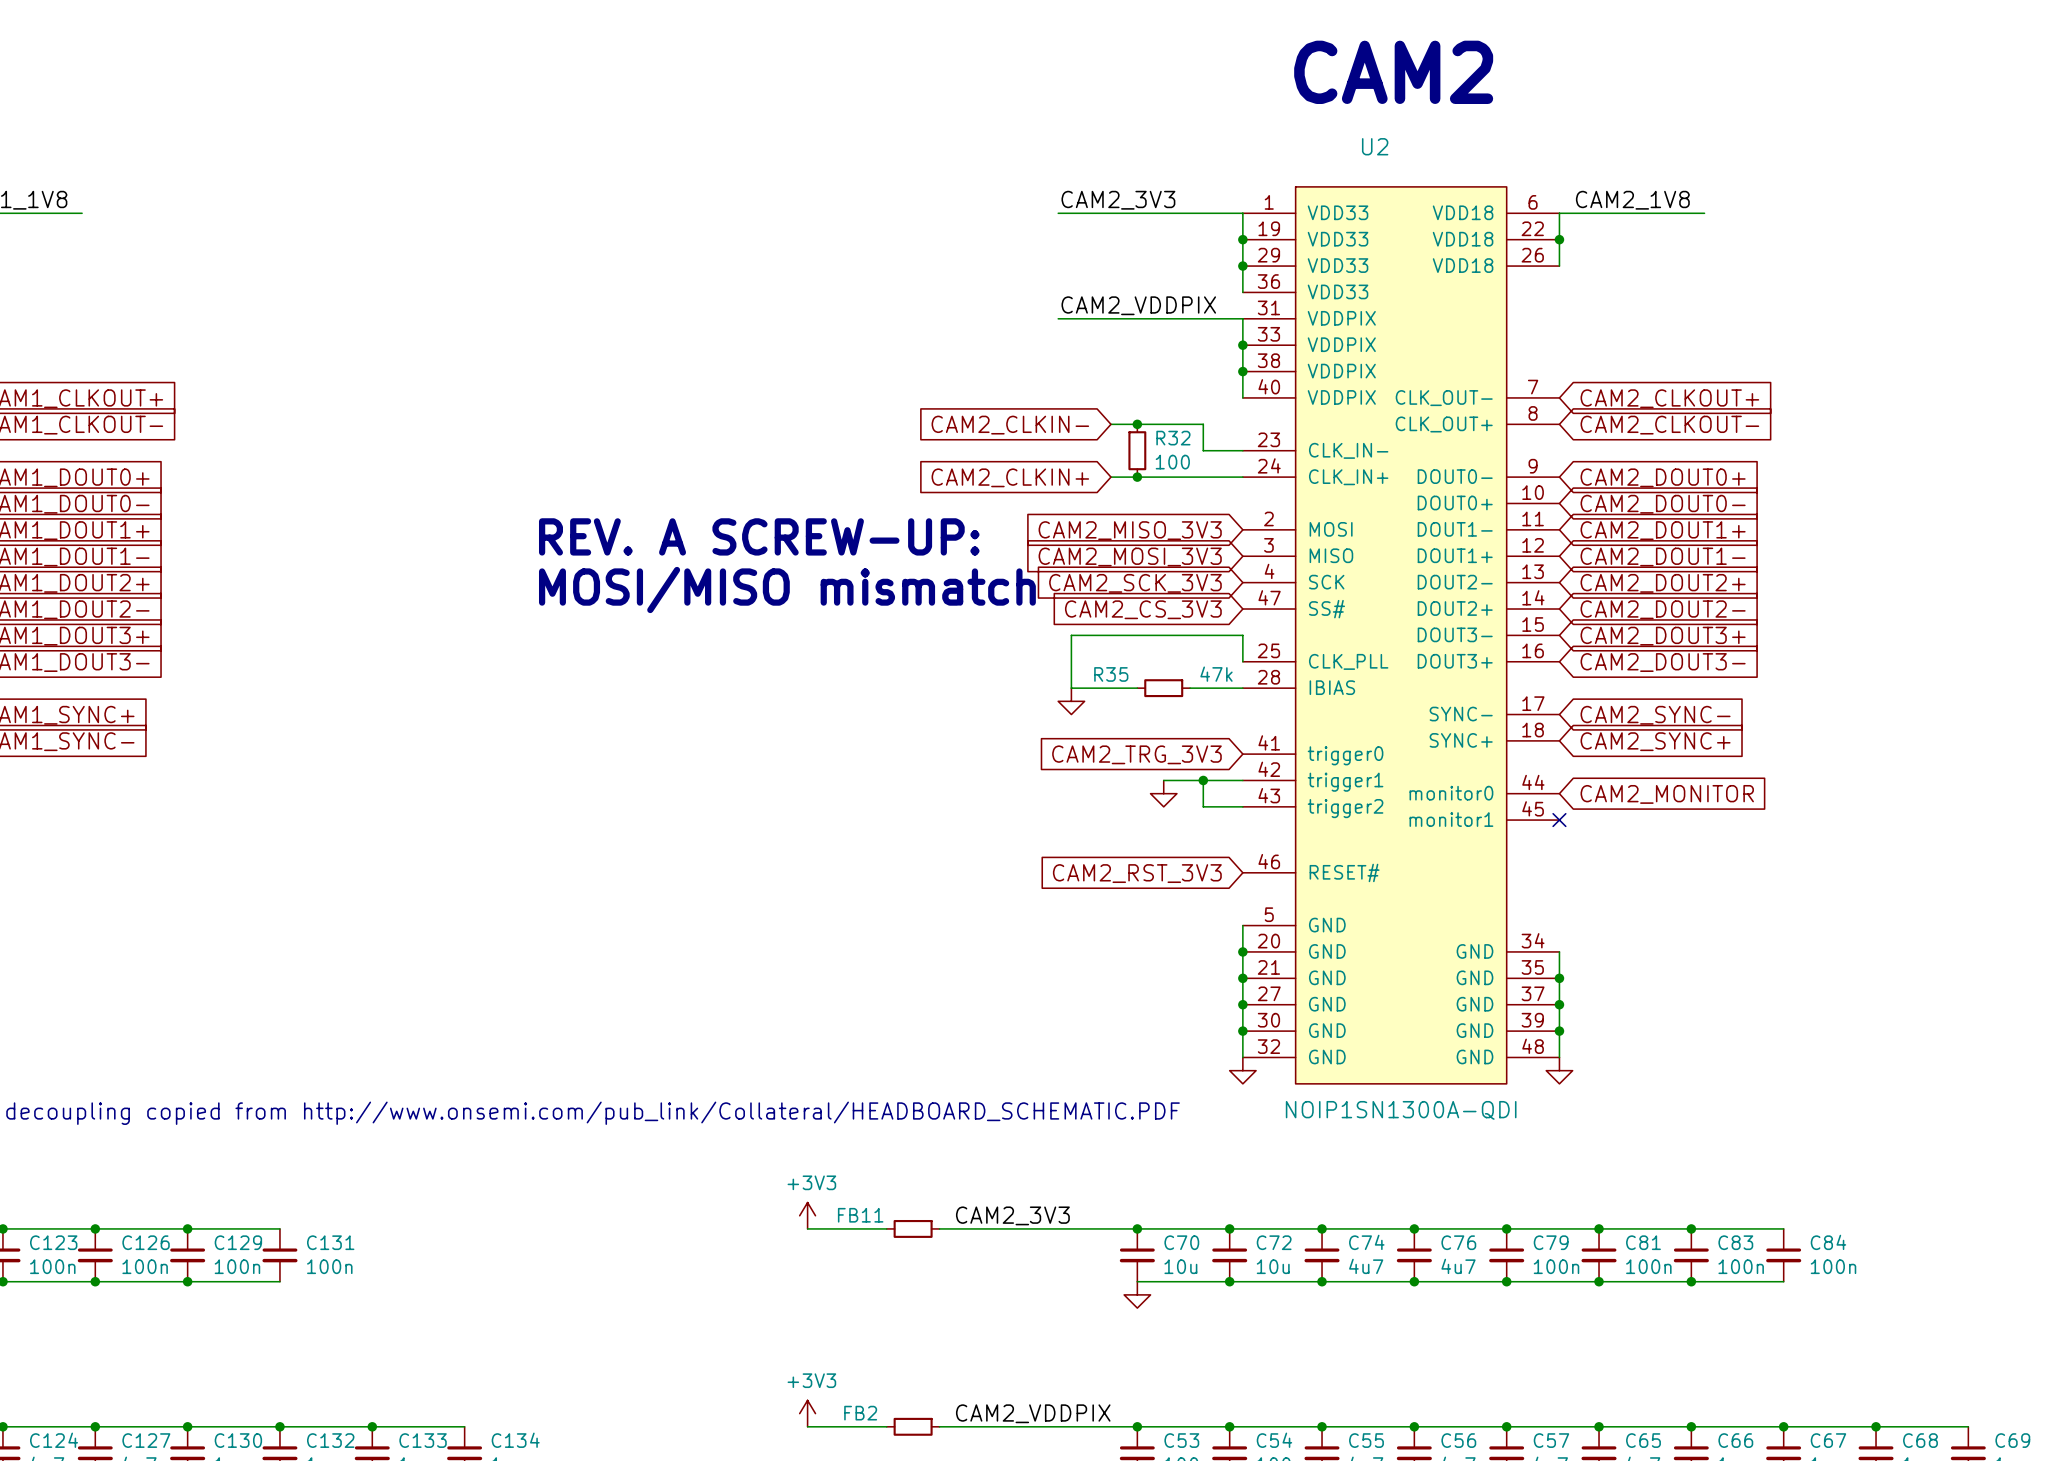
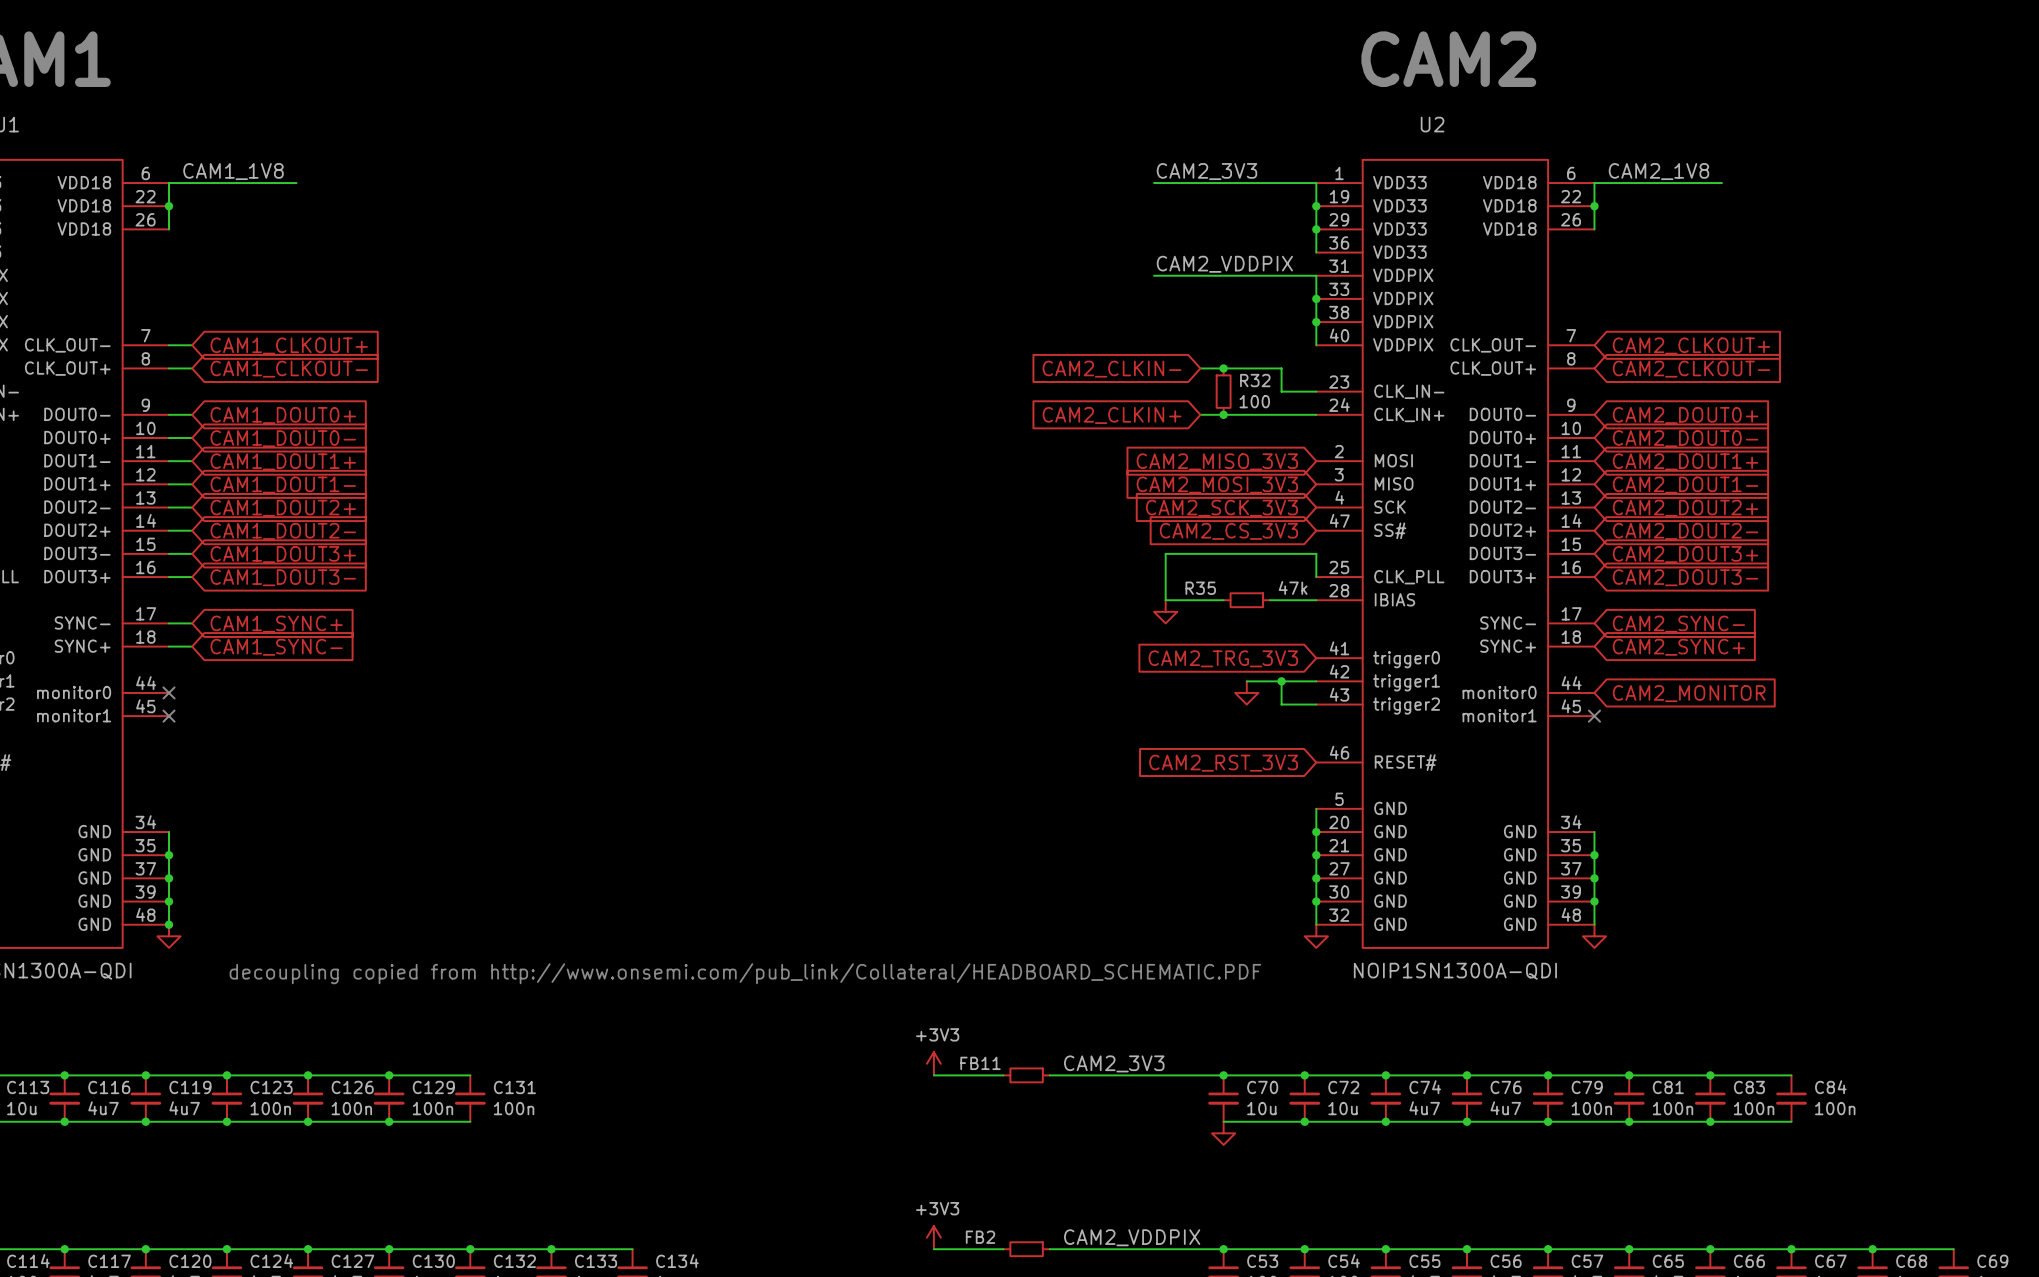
text: REV. A SCREW-UP: (759, 536) -> none
text: MOSI/MISO mismatch (787, 590) -> none

